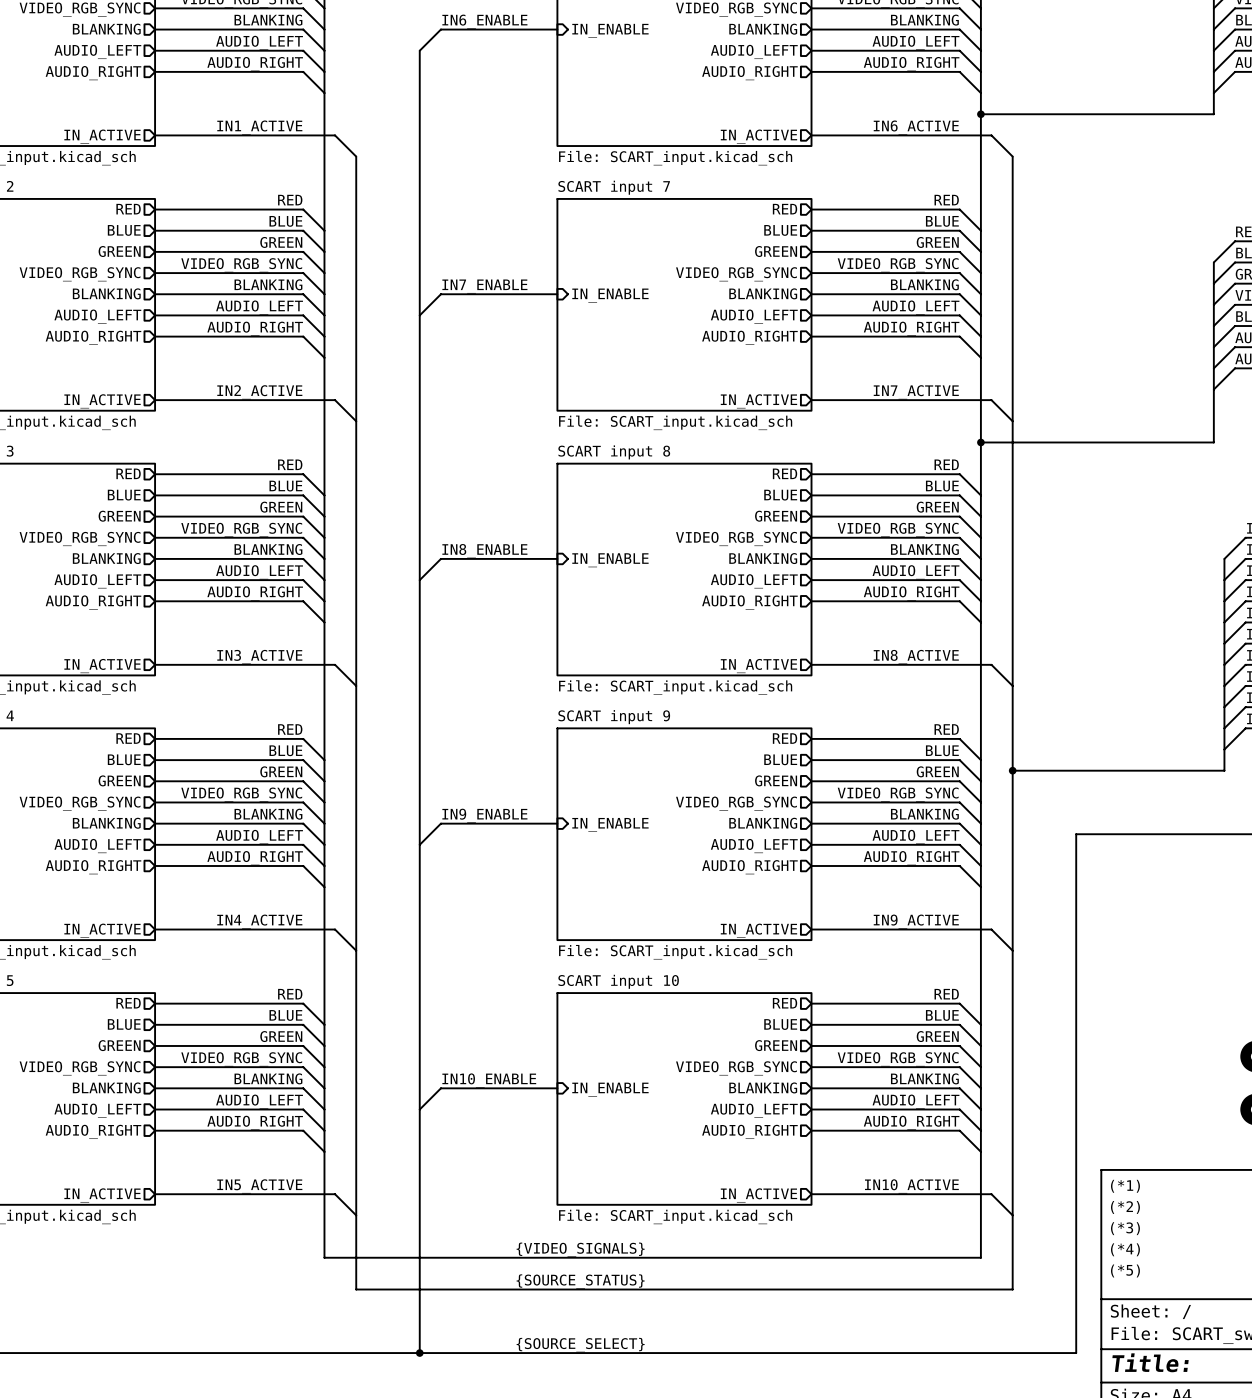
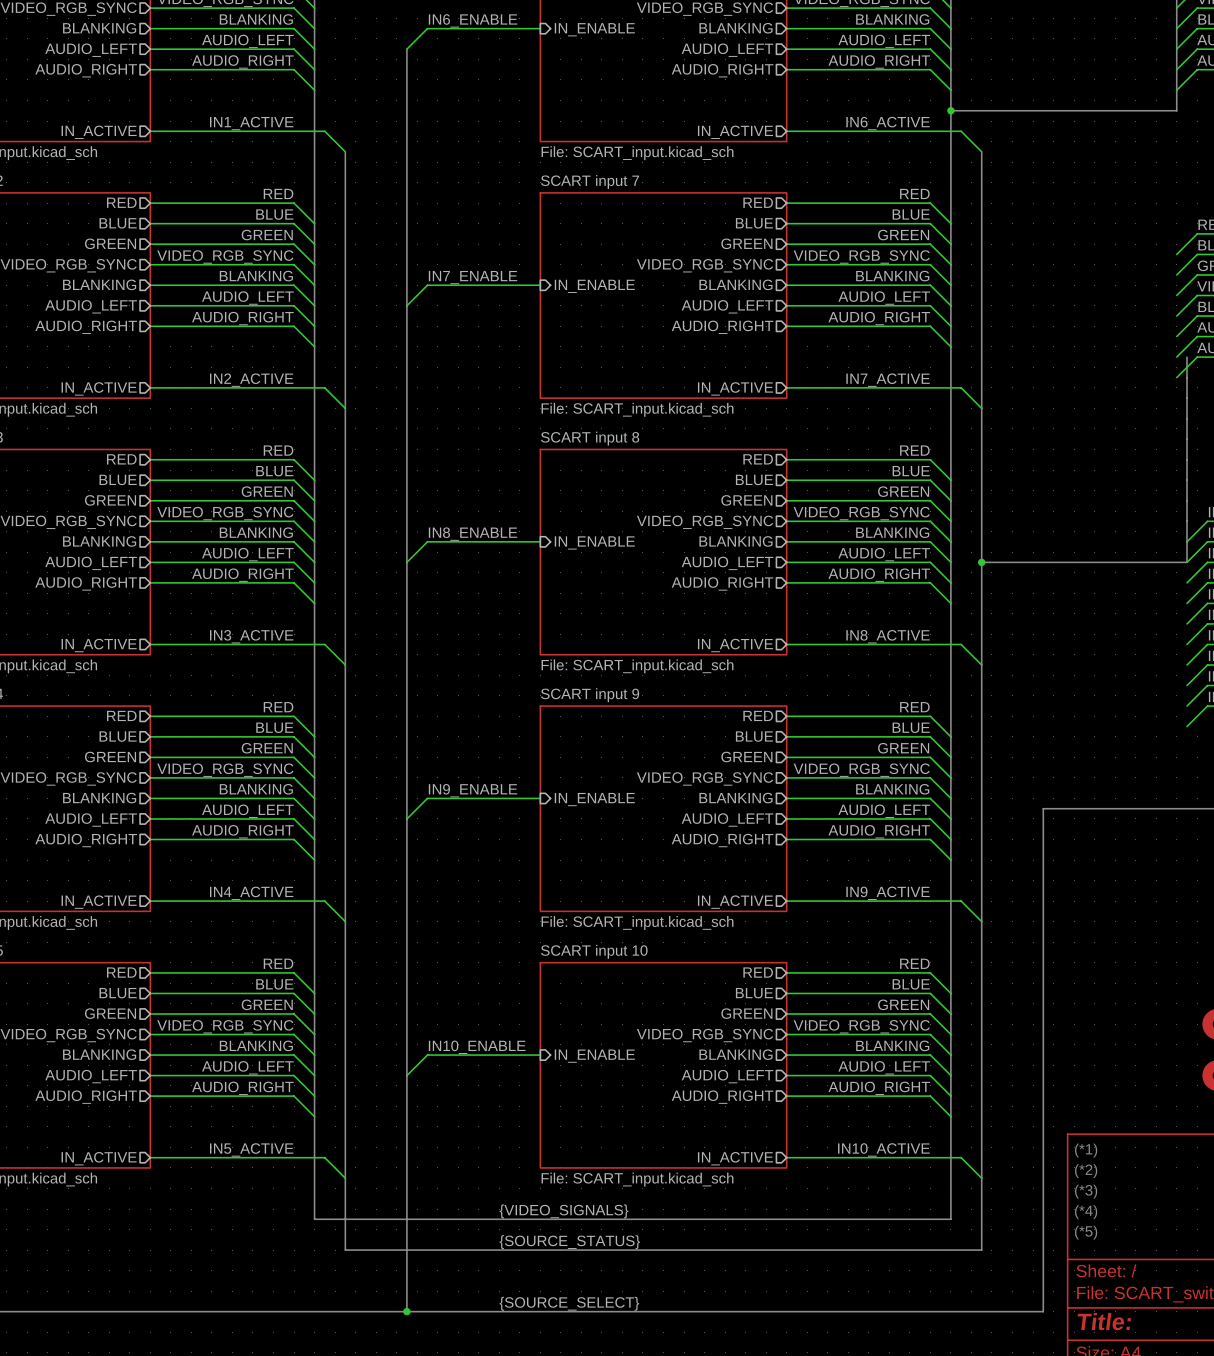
bus: (1213, 262) (1213, 442) (980, 442) -> none
bus: none -> (1186, 357) (1186, 541)
junction: (980, 442) -> none
junction: none -> (981, 562)
bus: (1224, 580) (1224, 770) (1012, 770) -> (1186, 562) (981, 562)
junction: (1012, 770) -> none

